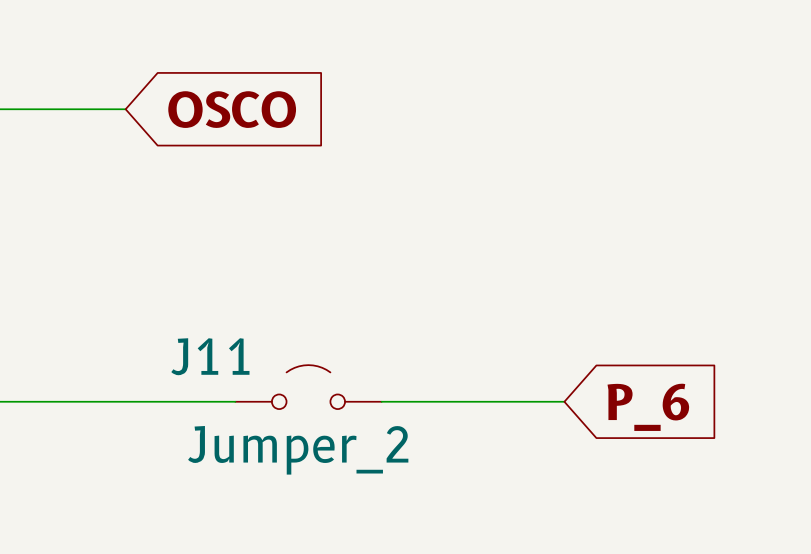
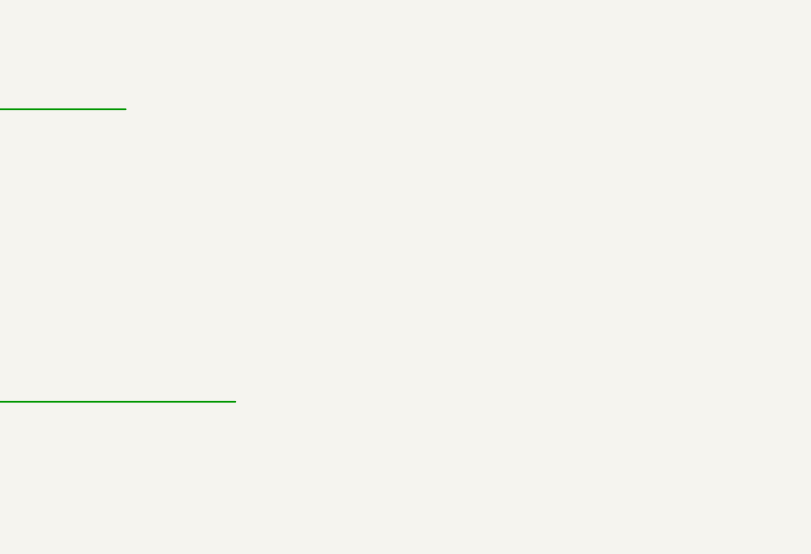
global label: OSCO (232, 109) -> none
J11: Jumper_2 (308, 387) -> none
wire: (381, 401) (564, 401) -> none
global label: P_6 (648, 407) -> none

